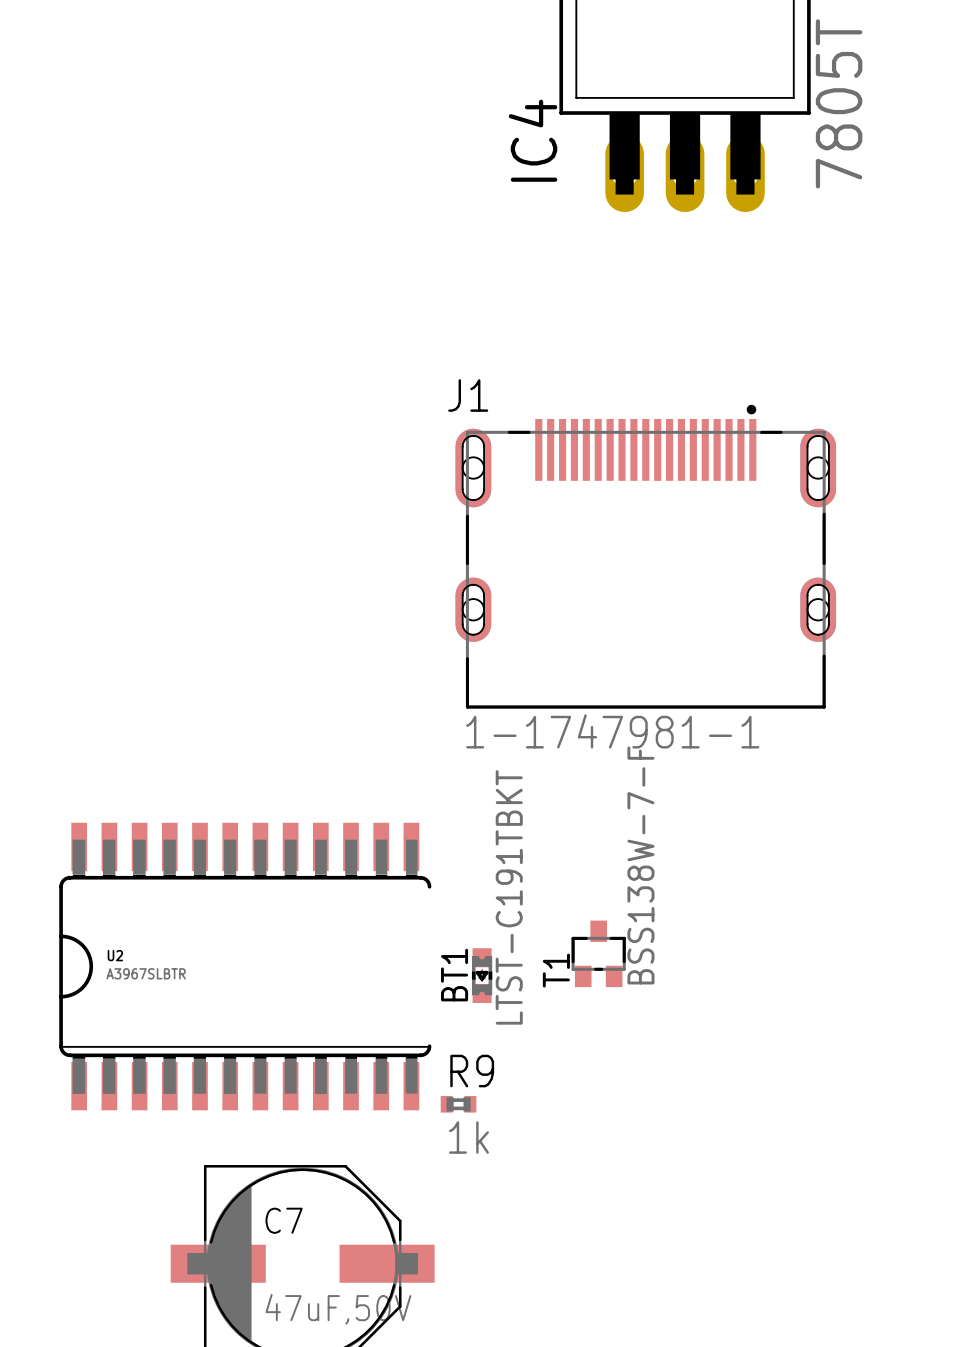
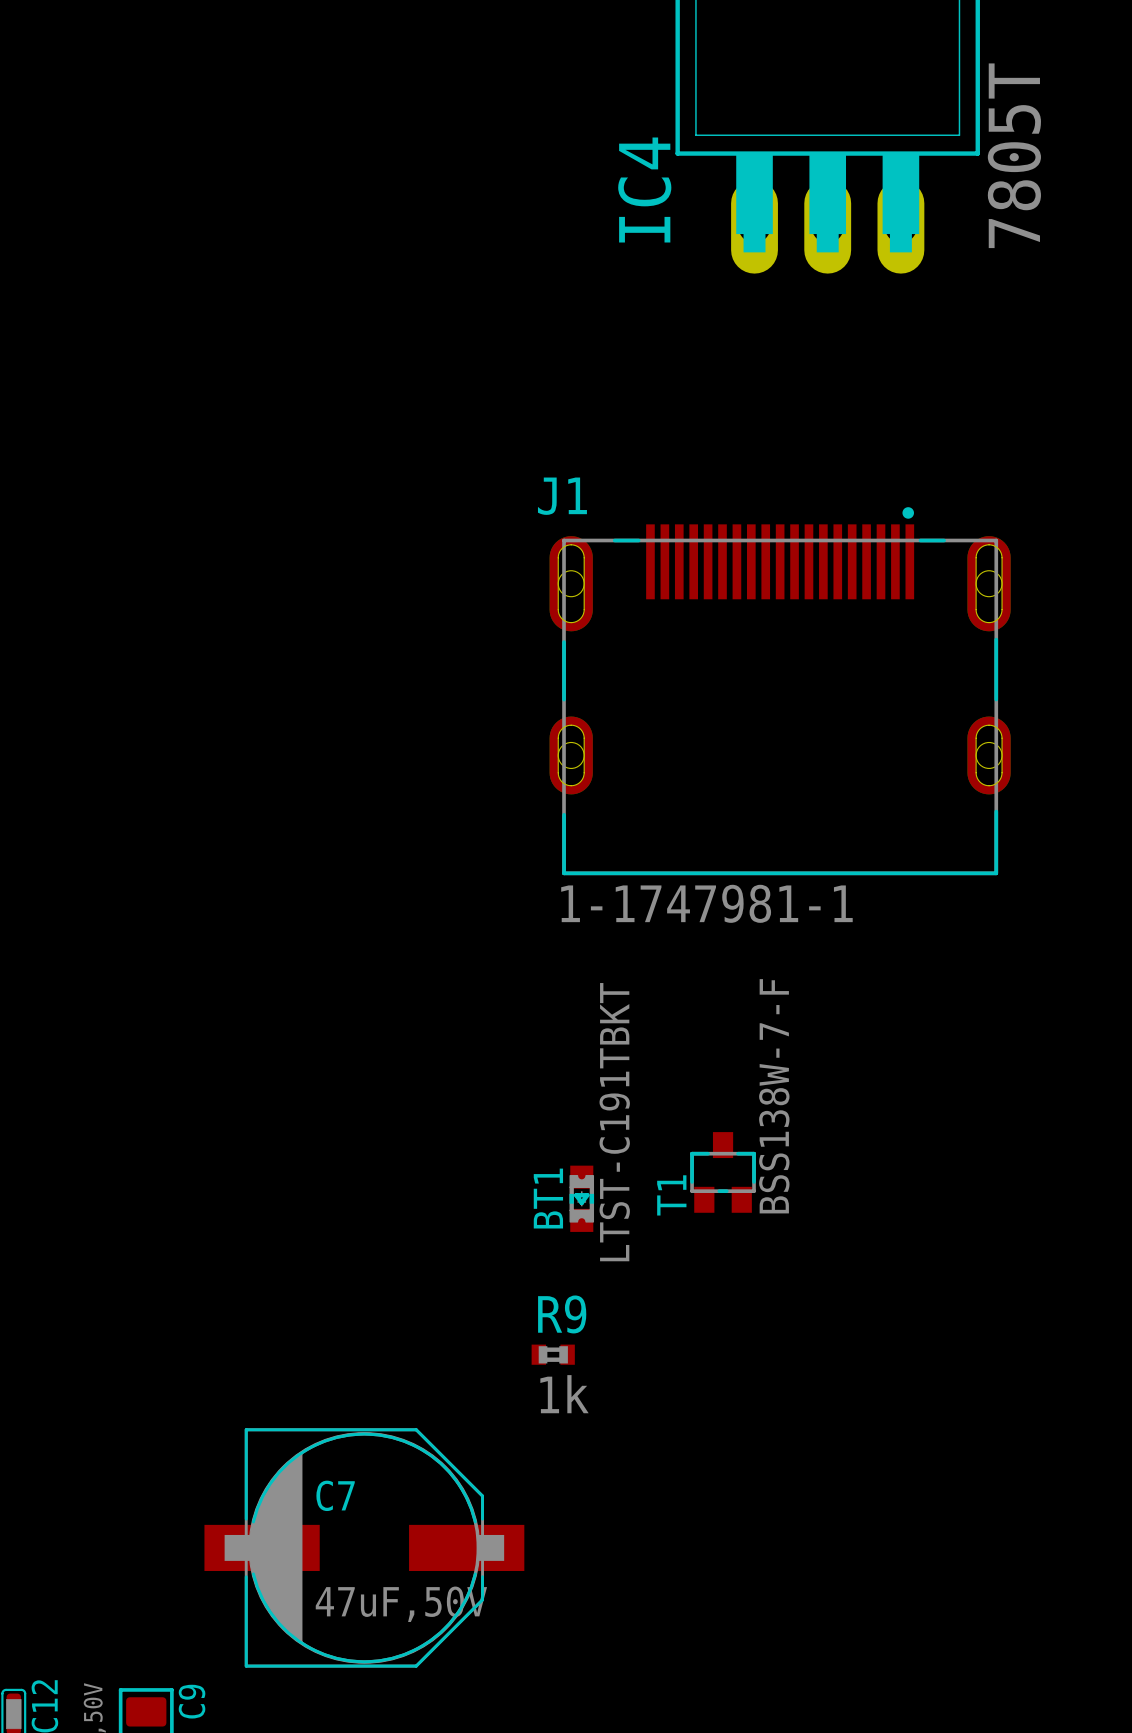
U2: A3967SLBTR (245, 966) -> none

